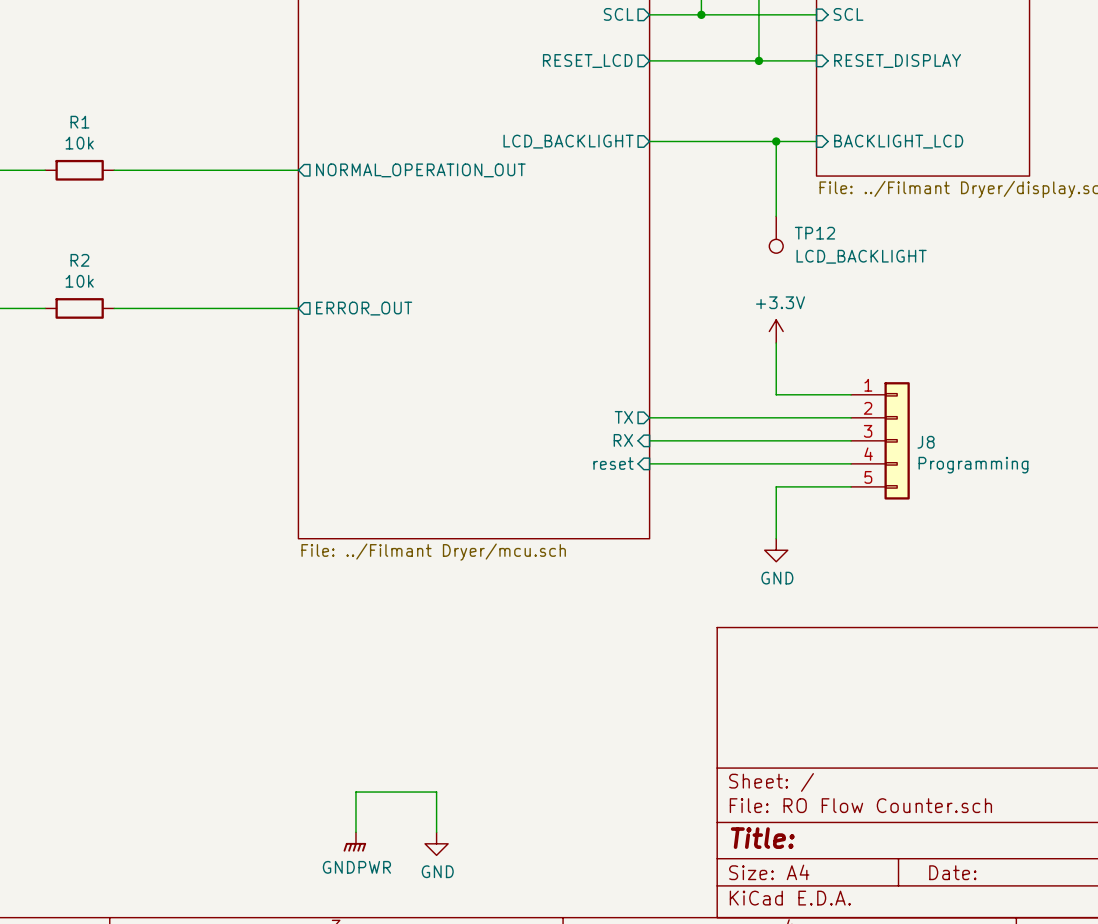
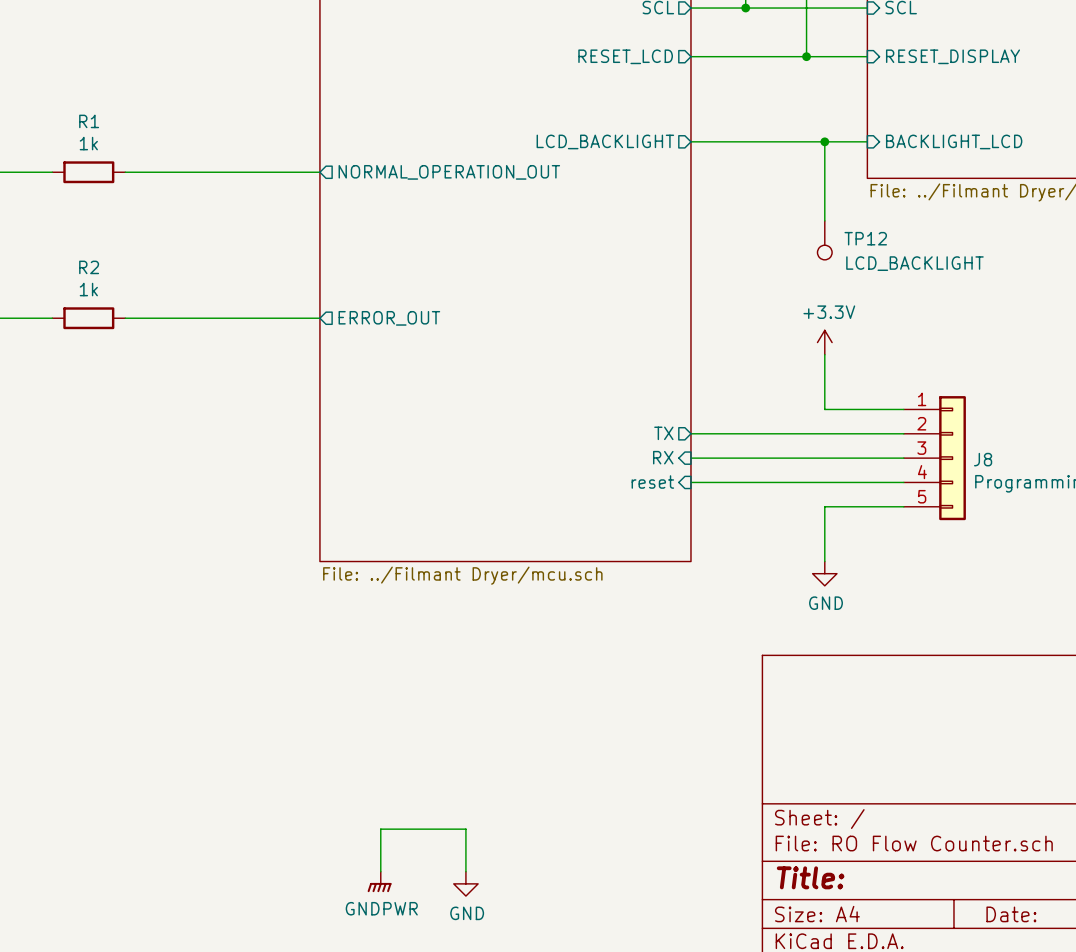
R1 value: 10k (79, 143) -> 1k (88, 143)
R2 value: 10k (79, 281) -> 1k (88, 289)

